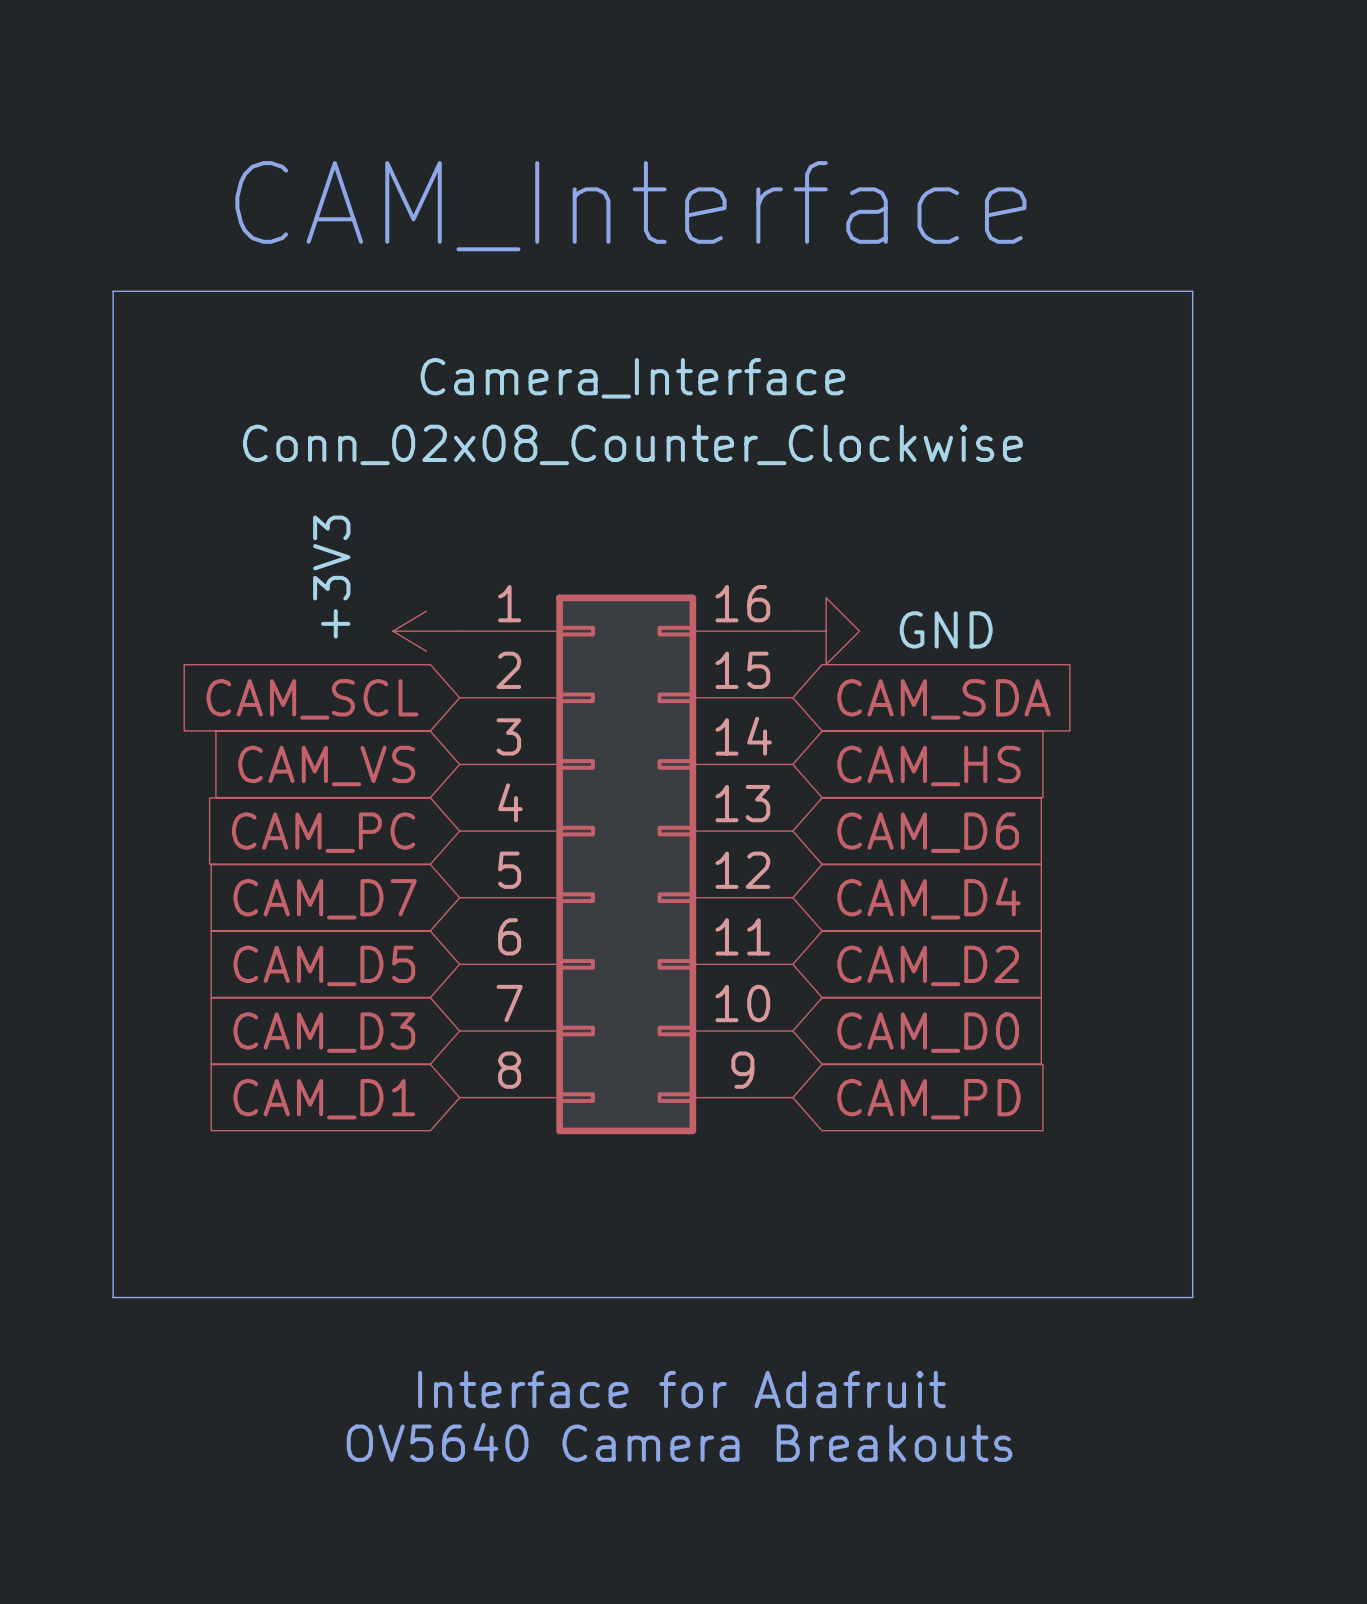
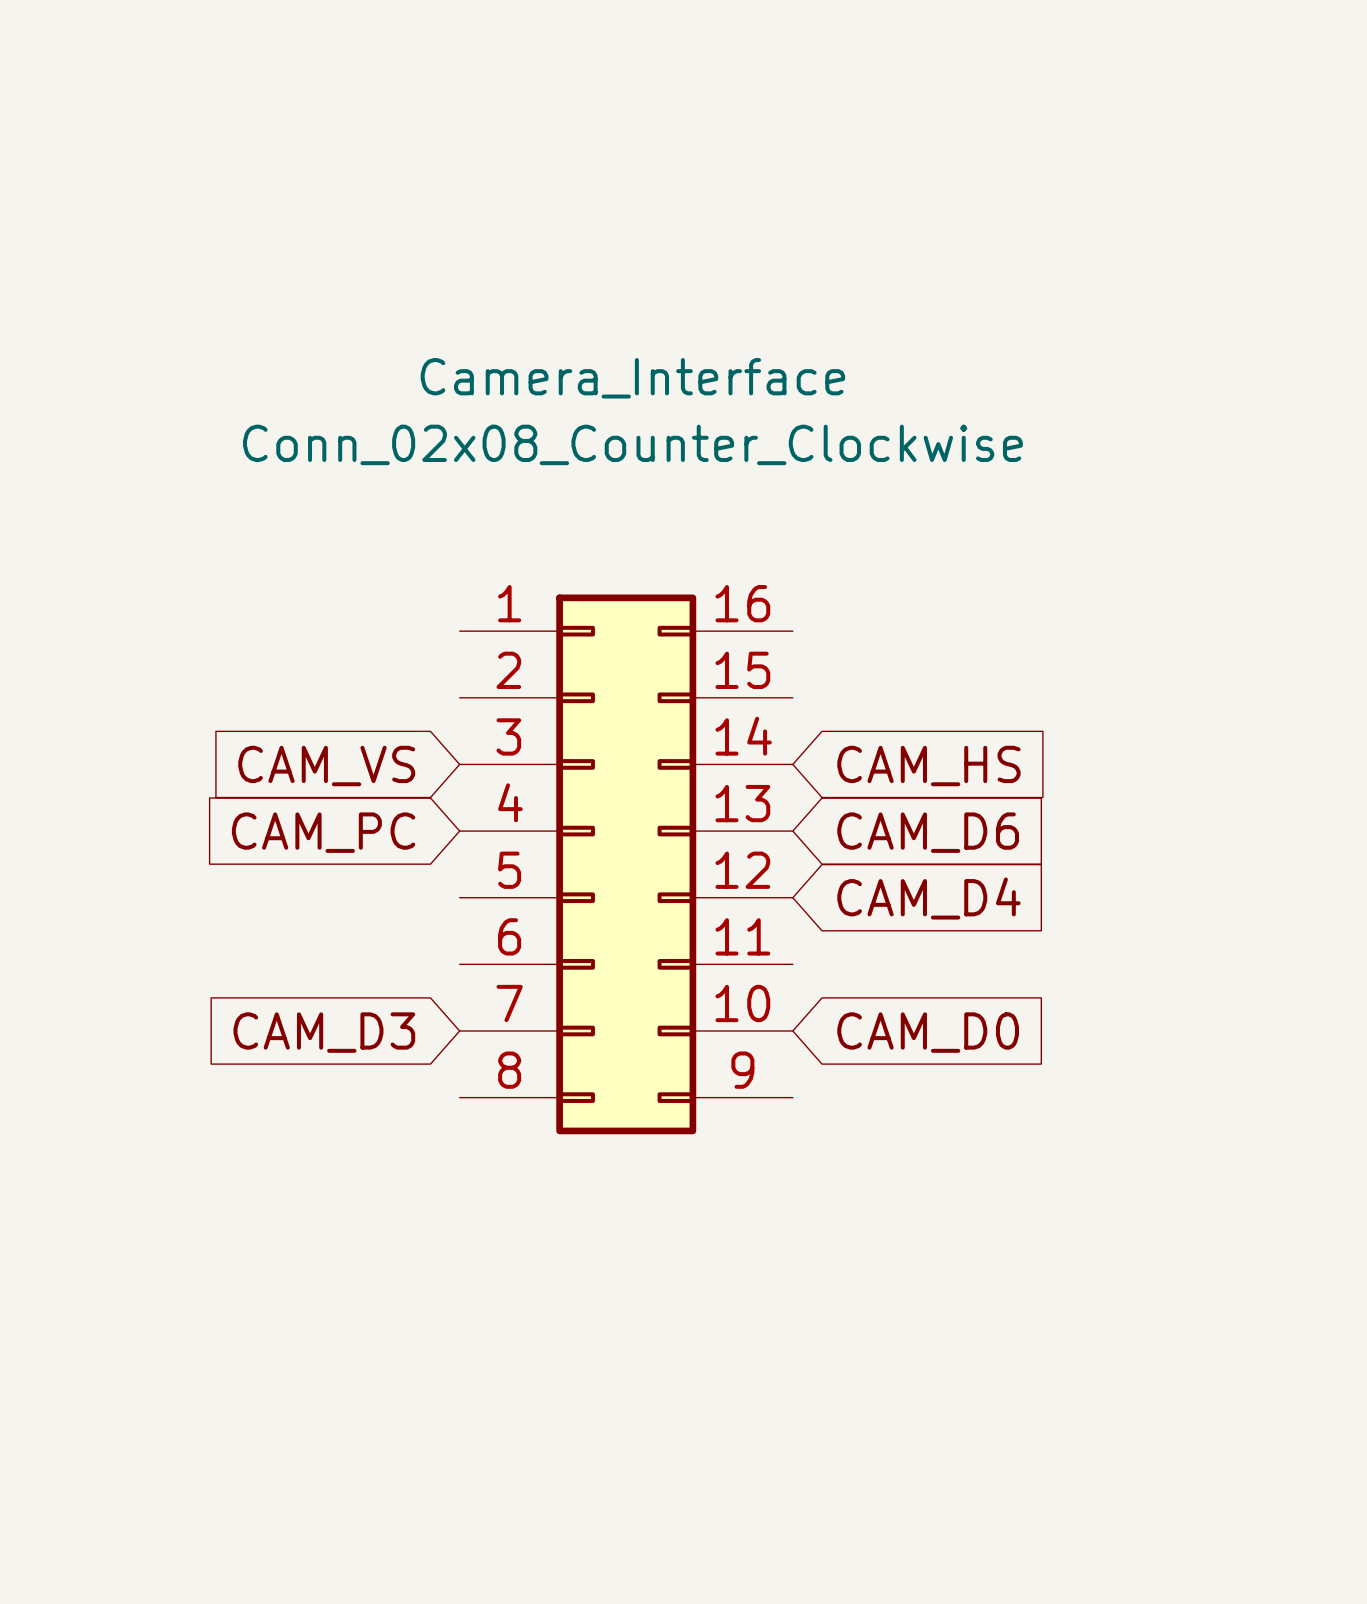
text: CAM_Interface (630, 206) -> none
line: (113, 291) (1192, 291) (1192, 1297) (113, 1297) (113, 291) -> none
power symbol: +3V3 (426, 631) -> none
power symbol: GND (826, 631) -> none
global label: CAM_SCL (312, 699) -> none
global label: CAM_SDA (944, 699) -> none
global label: CAM_D7 (325, 899) -> none
global label: CAM_D5 (324, 965) -> none
global label: CAM_D2 (928, 965) -> none
global label: CAM_D1 (324, 1099) -> none
global label: CAM_PD (928, 1099) -> none
text: Interface for Adafruit (681, 1389) -> none
text: OV5640 Camera Breakouts (679, 1442) -> none

